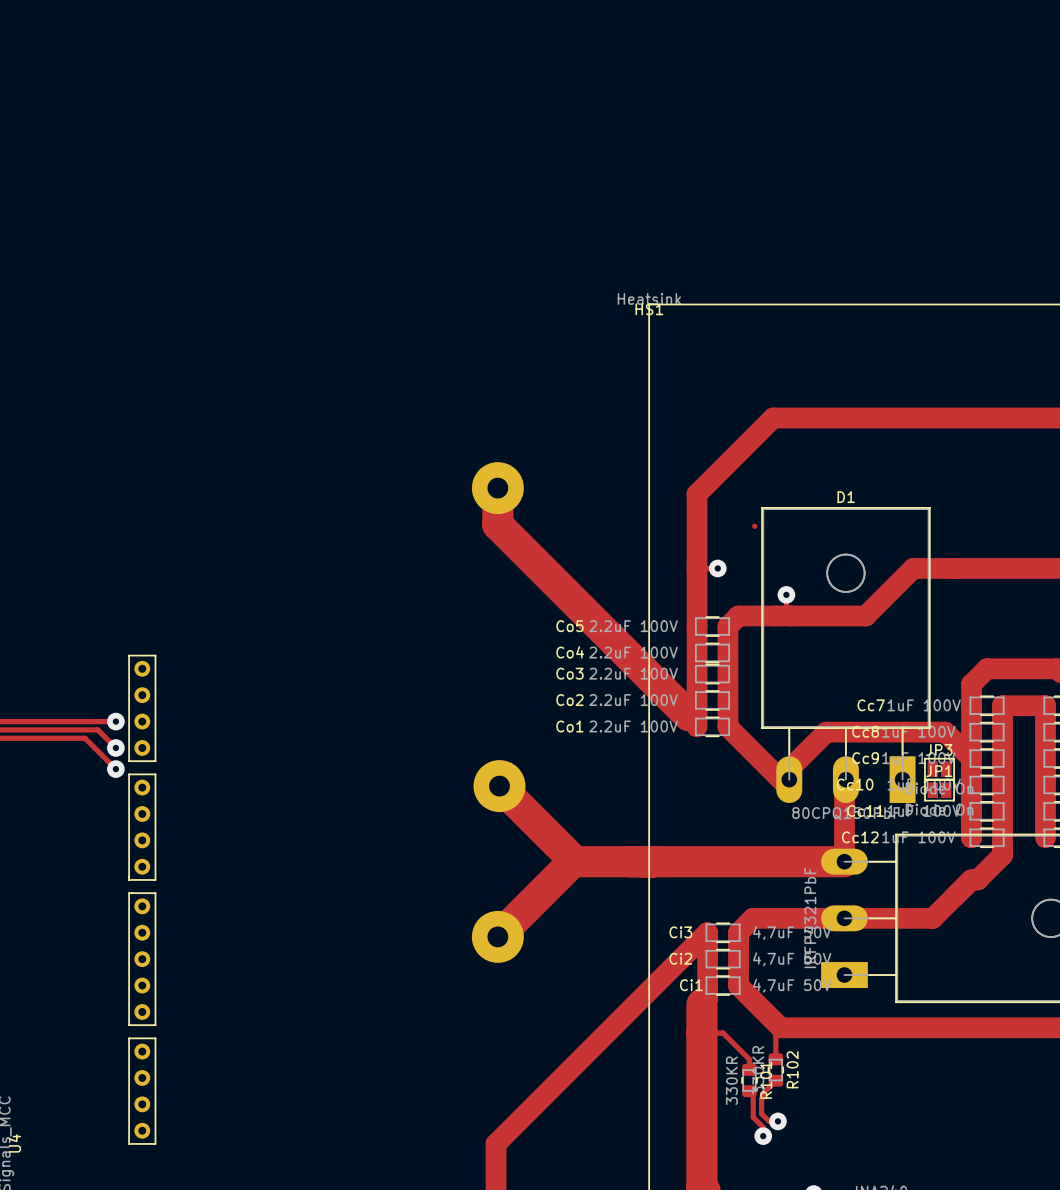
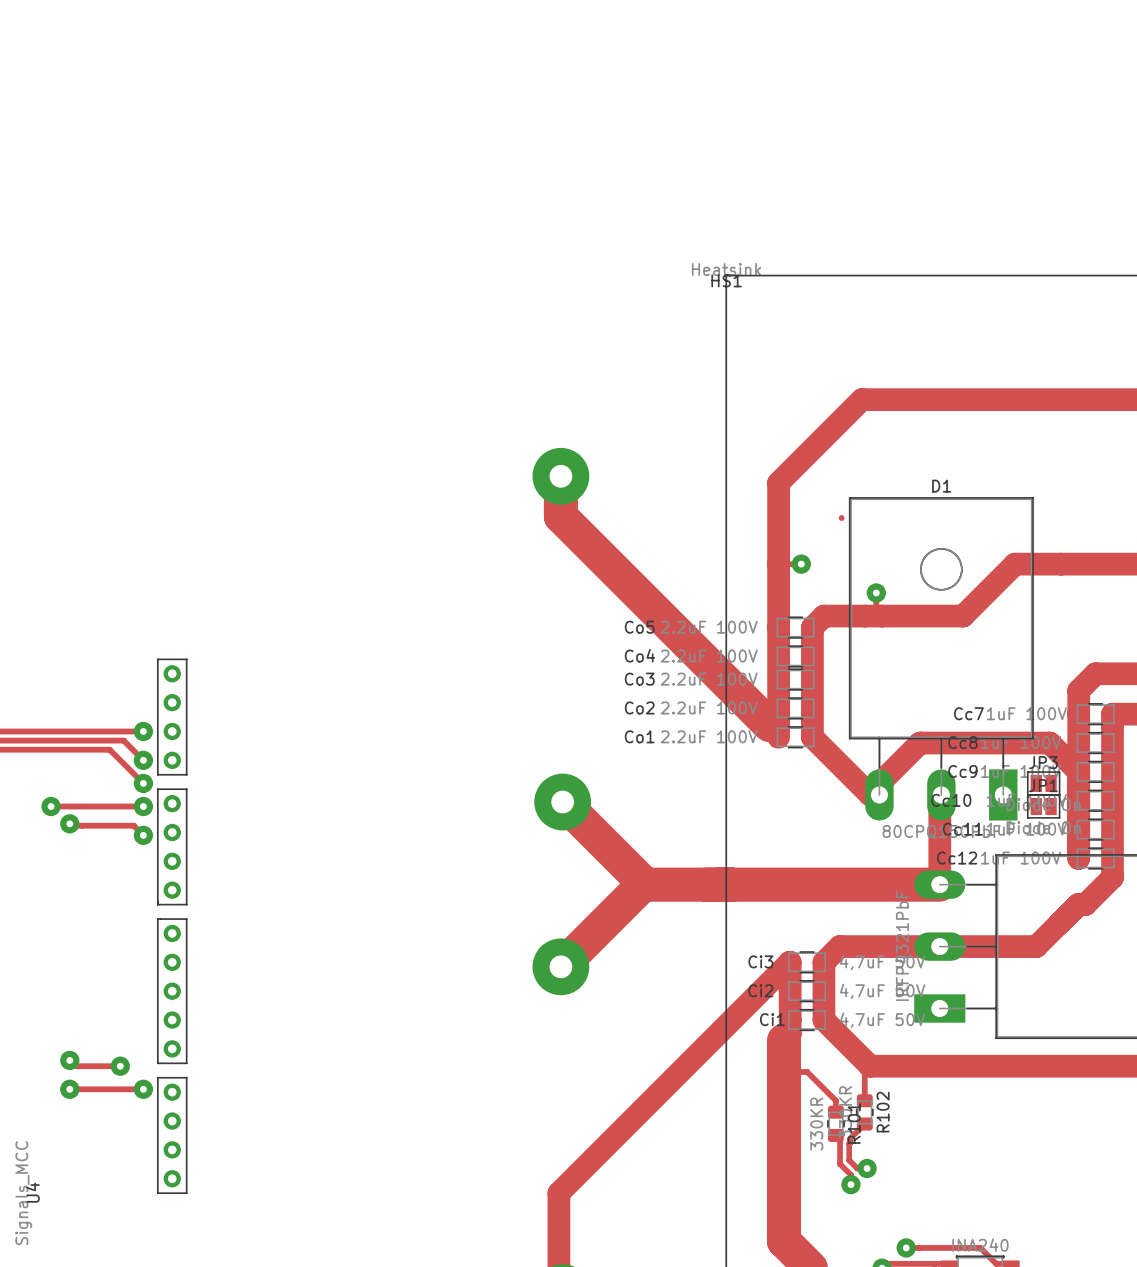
track: none -> (51, 806) (143, 806)
via: none -> (51, 806)
via: none -> (143, 806)
track: none -> (69, 823) (71, 825) (133, 825) (143, 835)
via: none -> (69, 823)
via: none -> (143, 835)
track: none -> (69, 1060) (75, 1066) (120, 1066)
via: none -> (69, 1060)
via: none -> (120, 1066)
track: none -> (69, 1089) (143, 1089)
via: none -> (69, 1089)
via: none -> (143, 1089)

